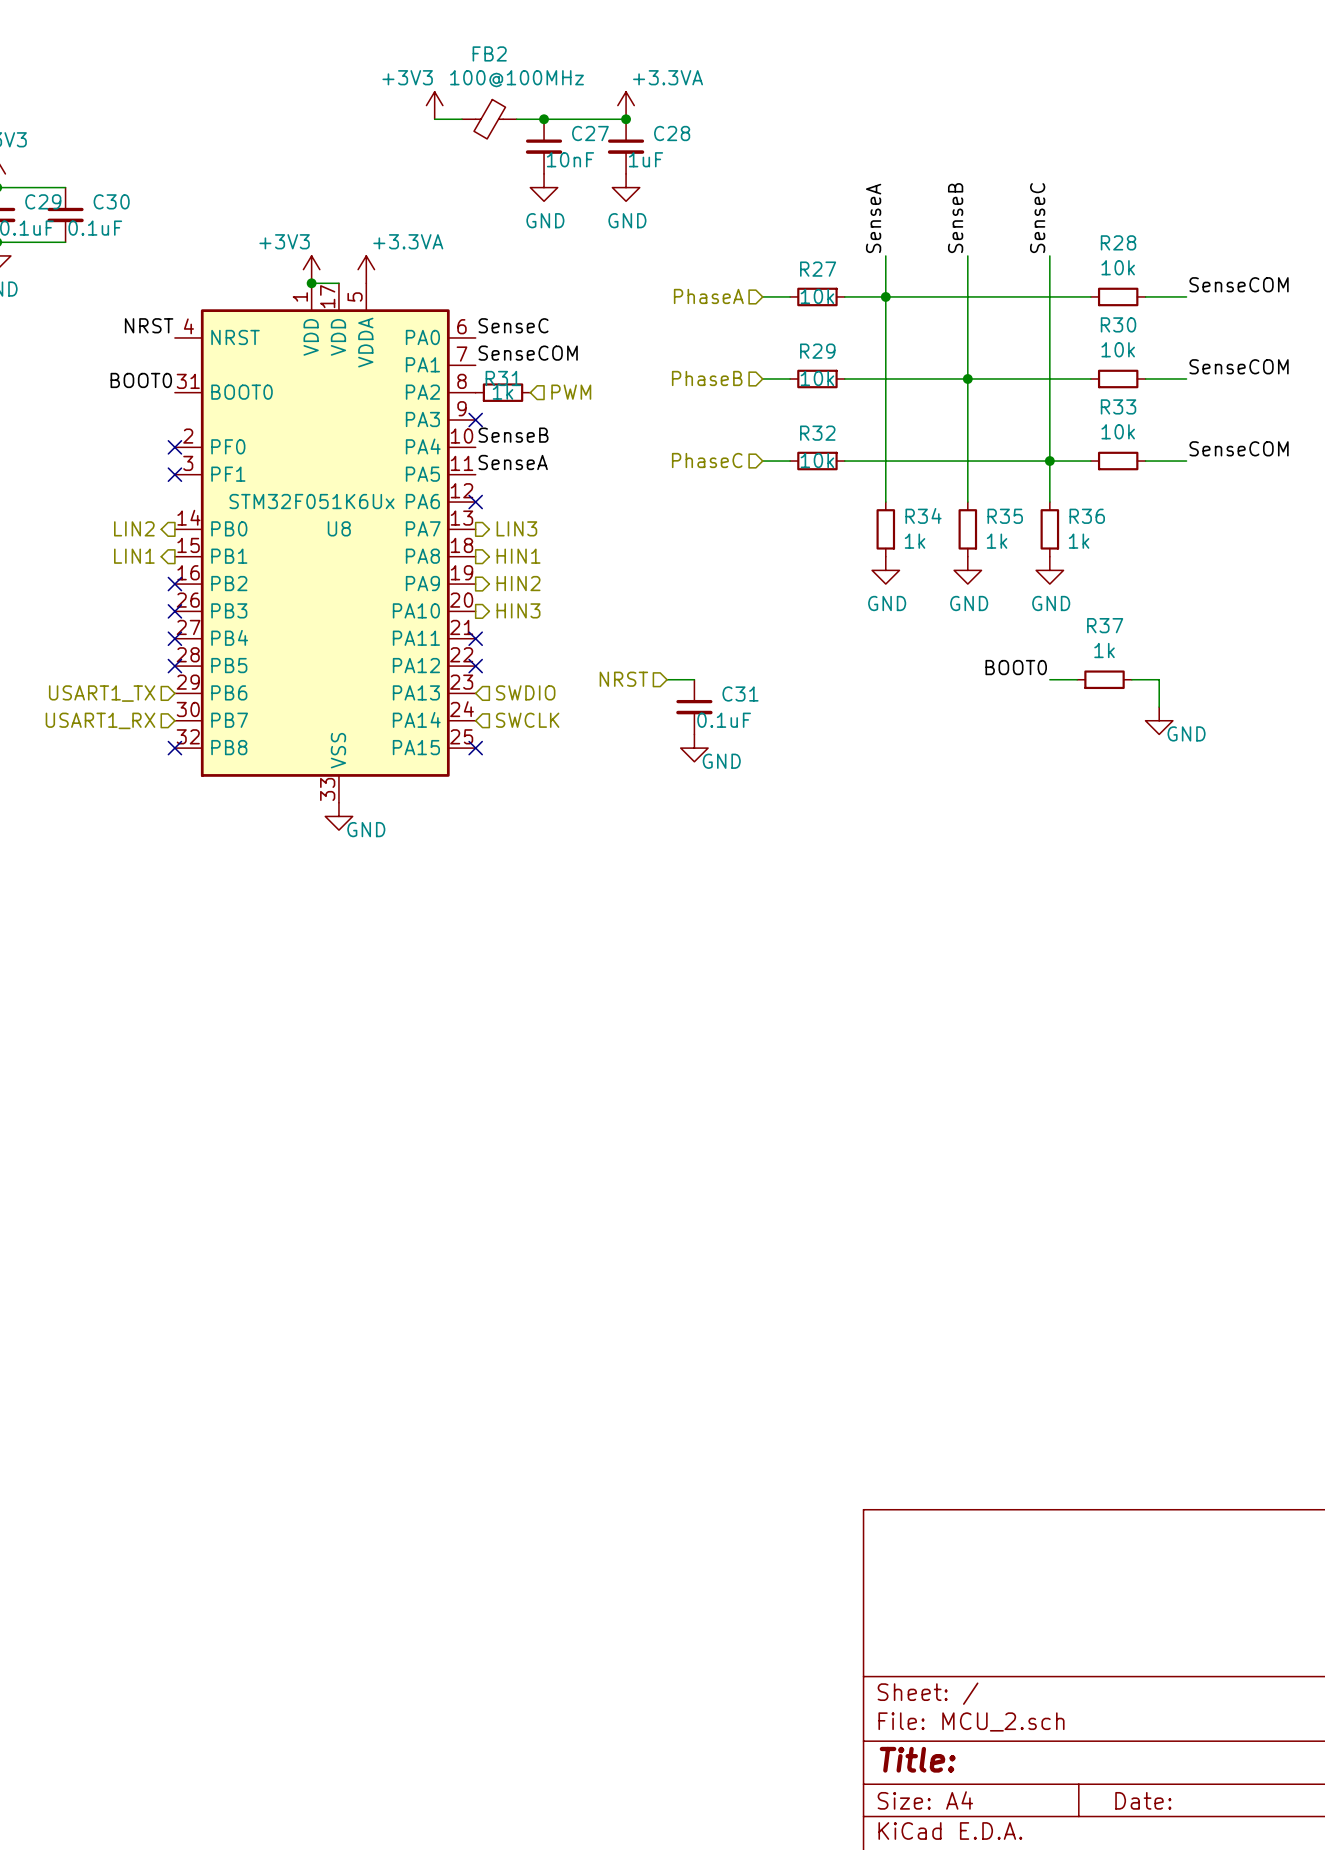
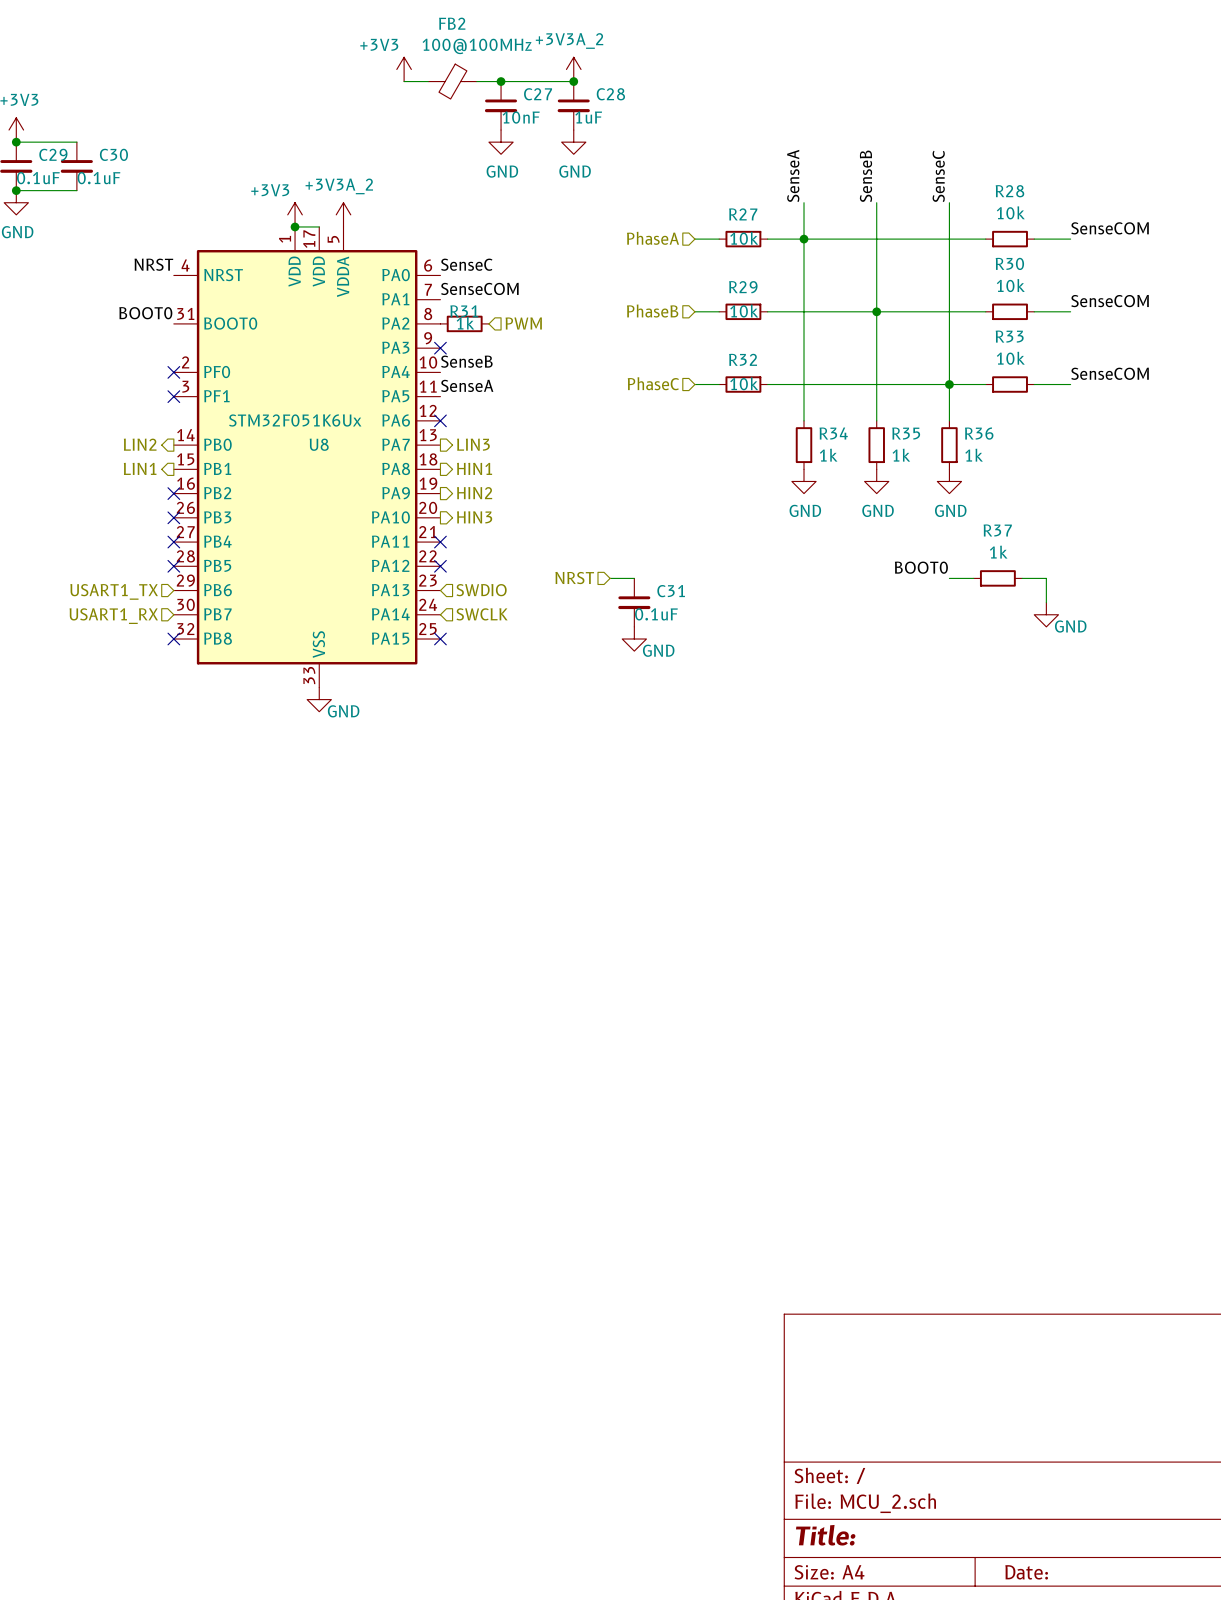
power symbol: +3.3VA (626, 105) -> +3V3A_2 (573, 69)
power symbol: +3.3VA (366, 269) -> +3V3A_2 (343, 214)

